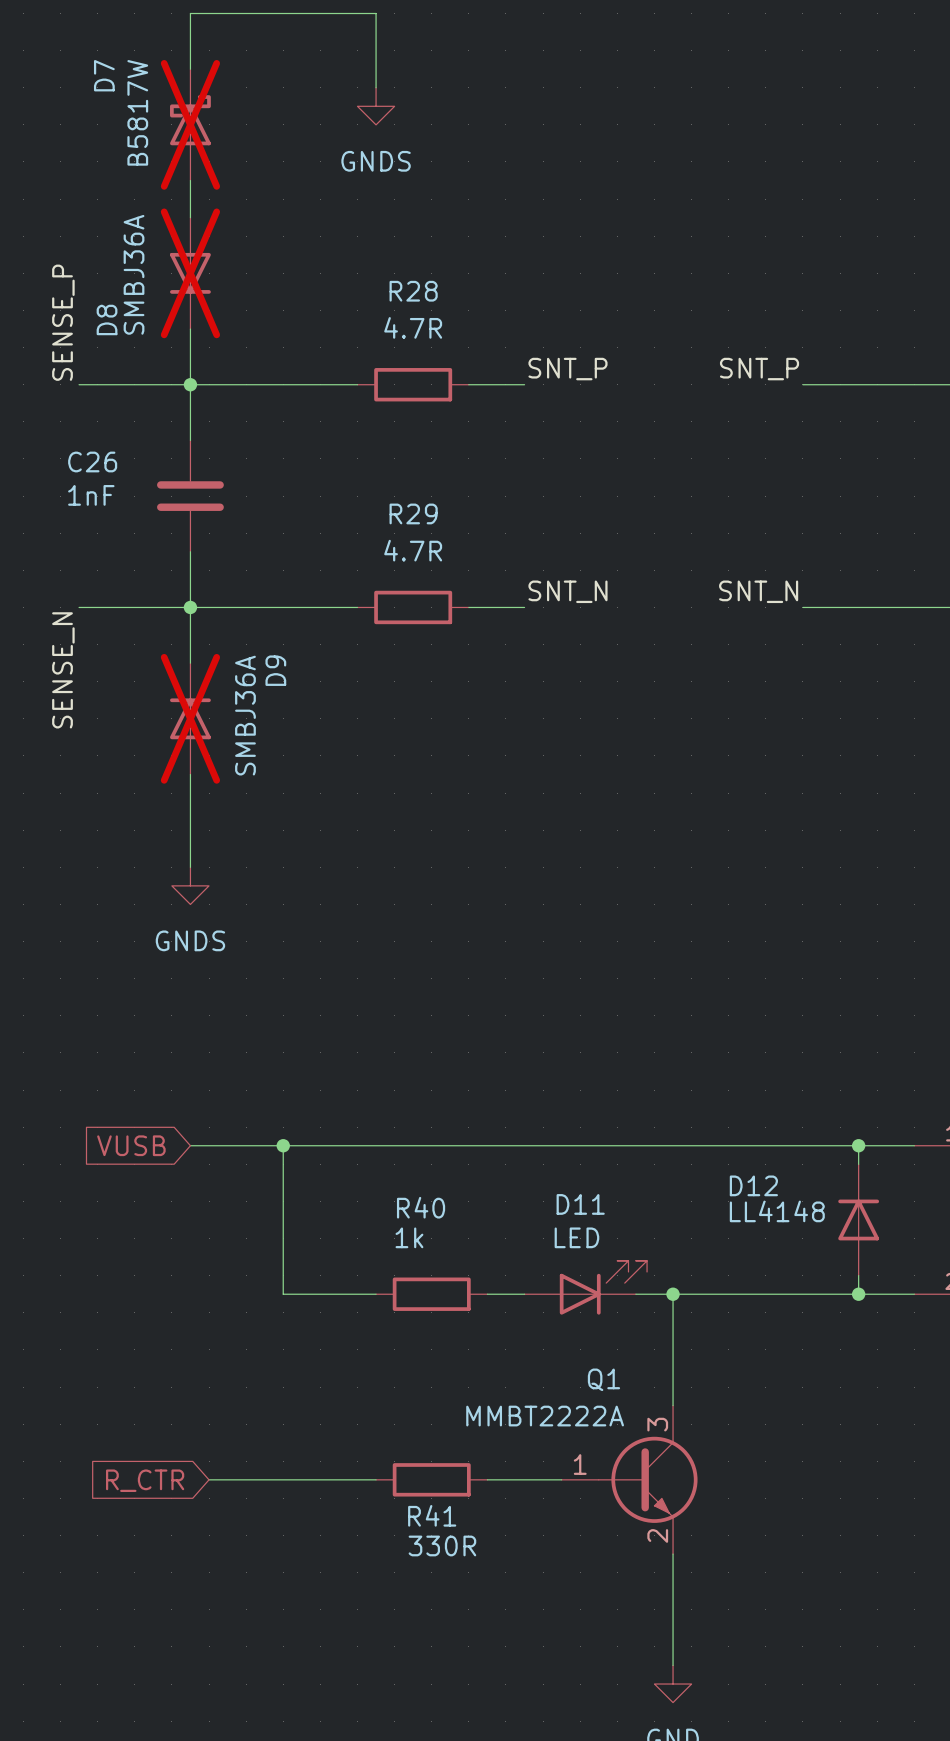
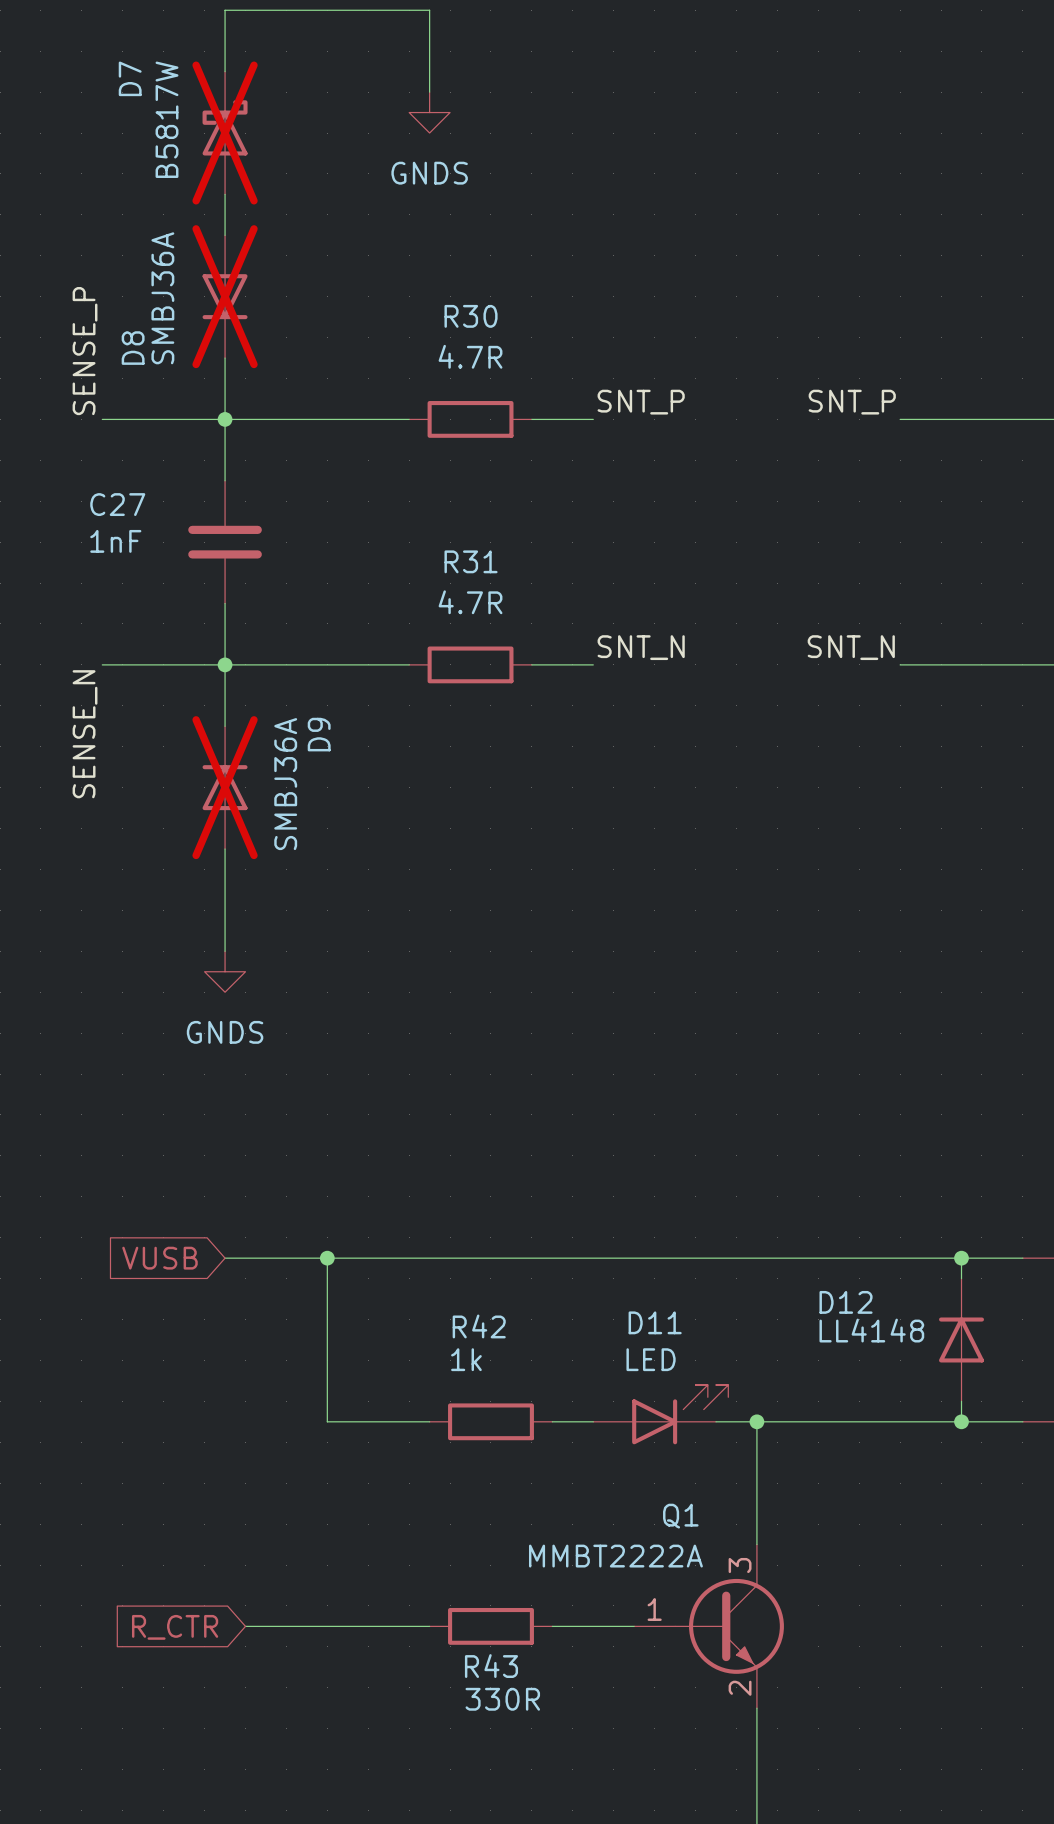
R28 name: R28 (413, 291) -> R30 (471, 316)
C26 name: C26 (92, 461) -> C27 (117, 504)
R29 name: R29 (413, 513) -> R31 (471, 561)
R40 name: R40 (421, 1207) -> R42 (479, 1326)
R41 name: R41 (432, 1515) -> R43 (491, 1666)

